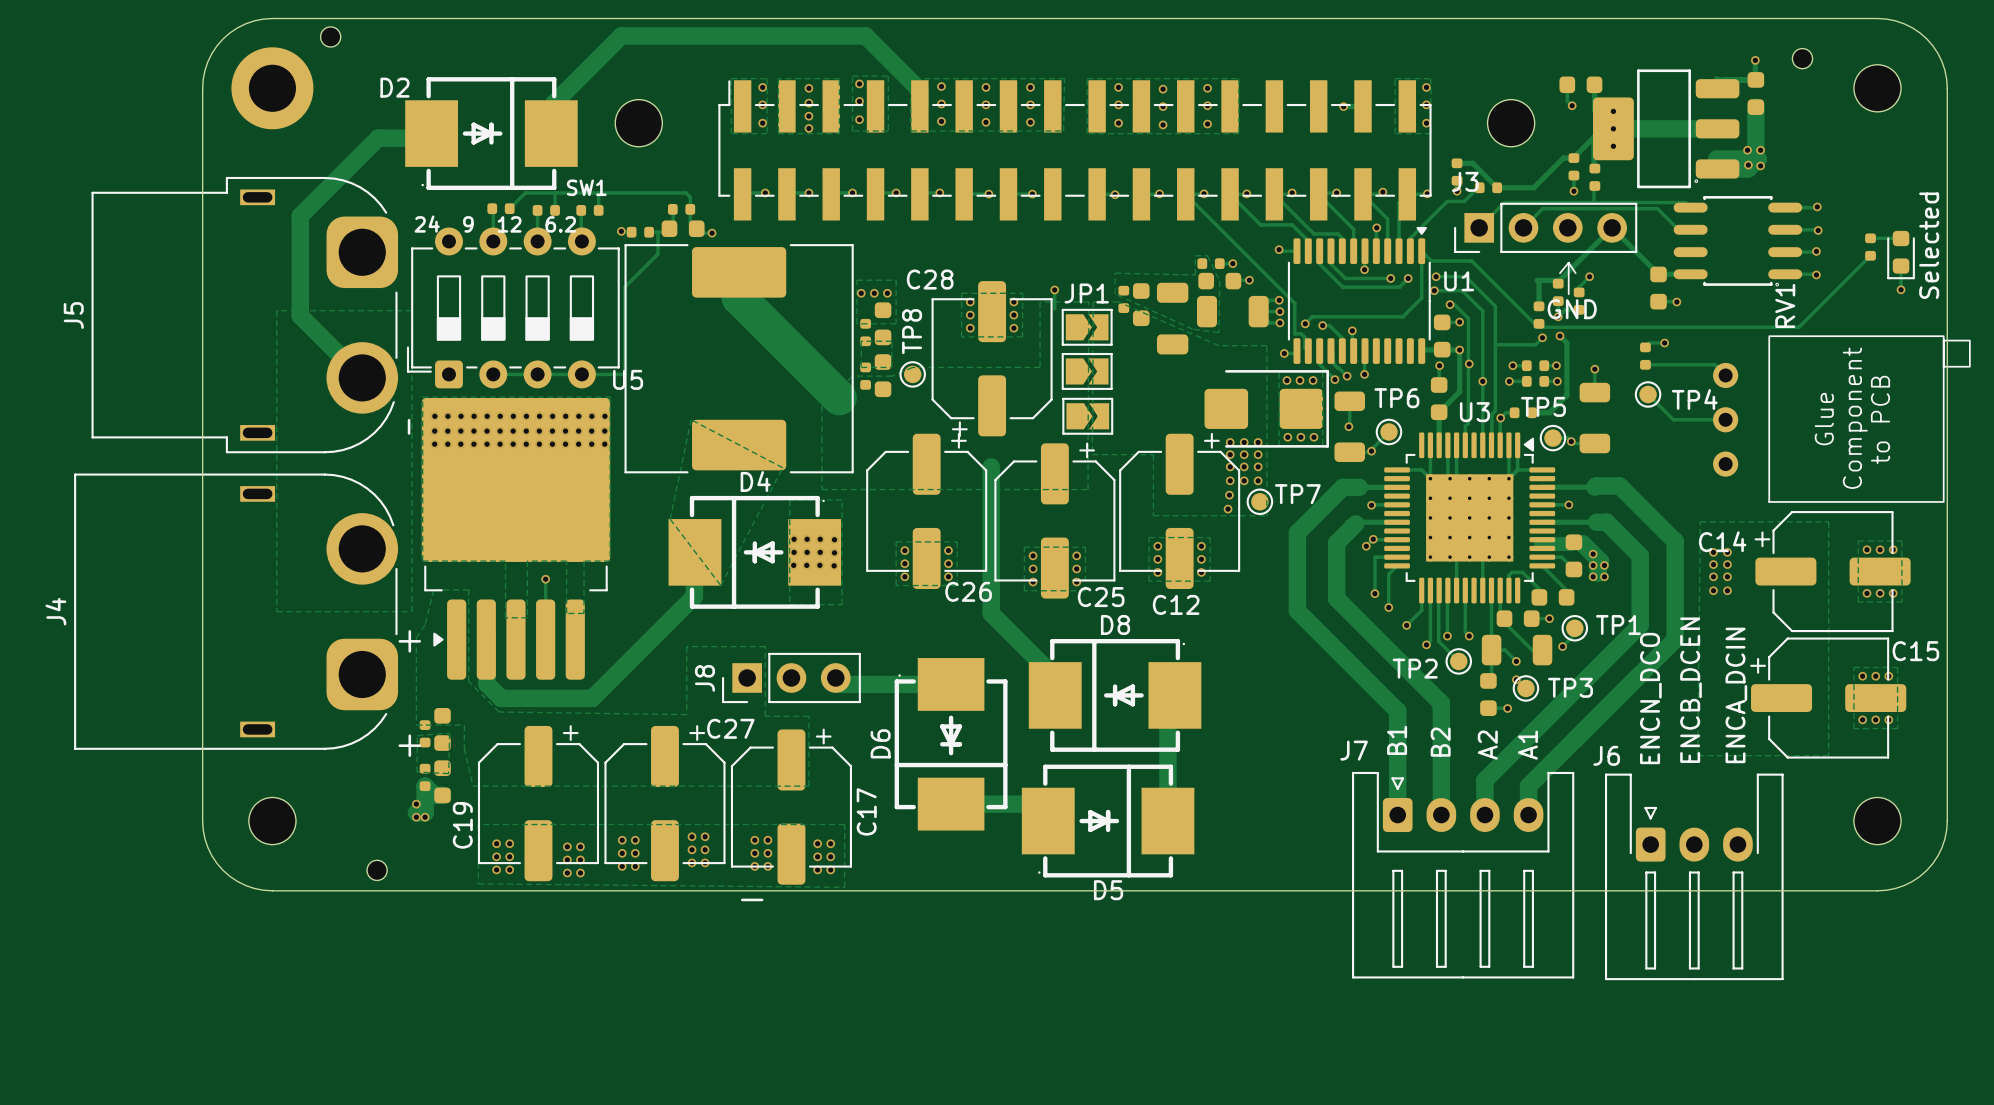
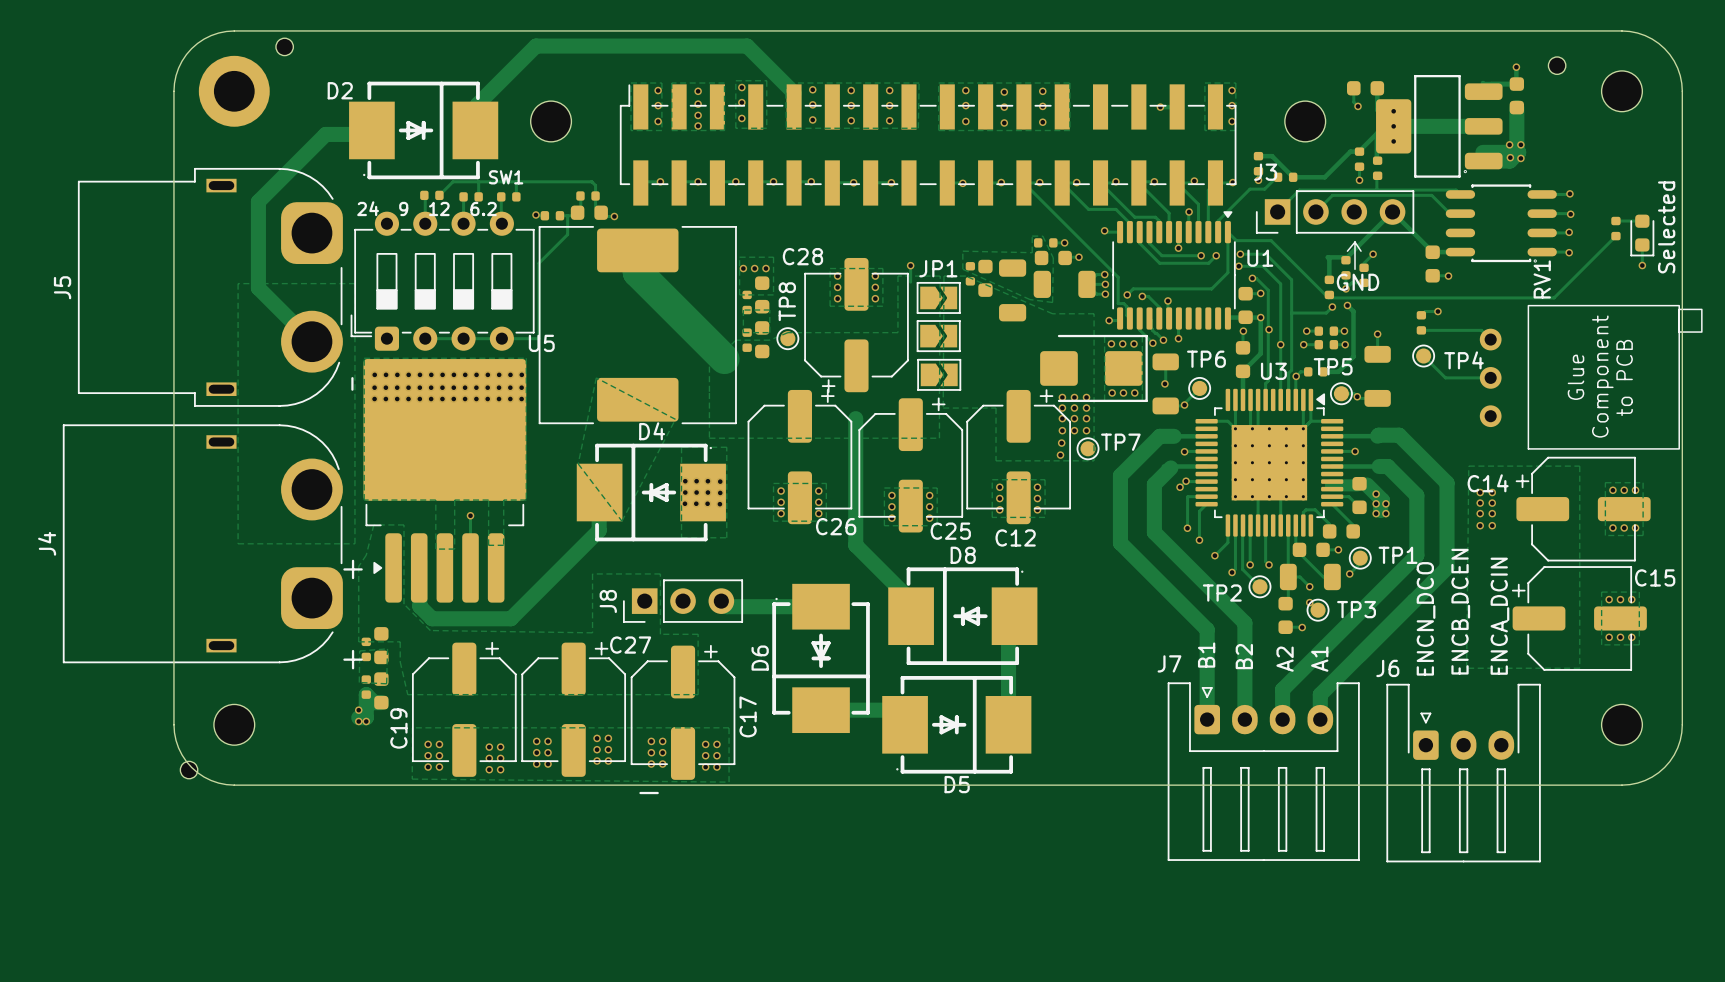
part position: (377, 870) -> (189, 770)

